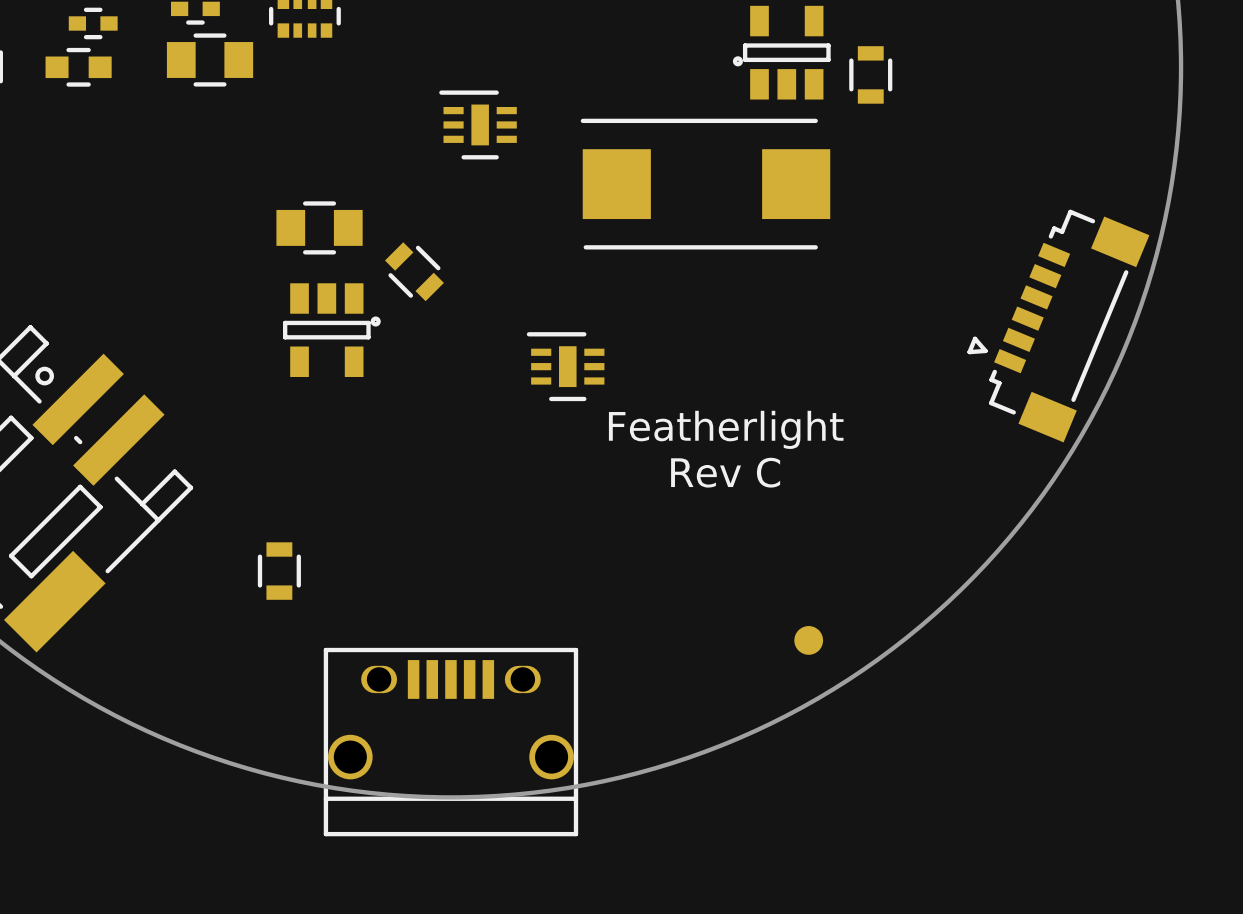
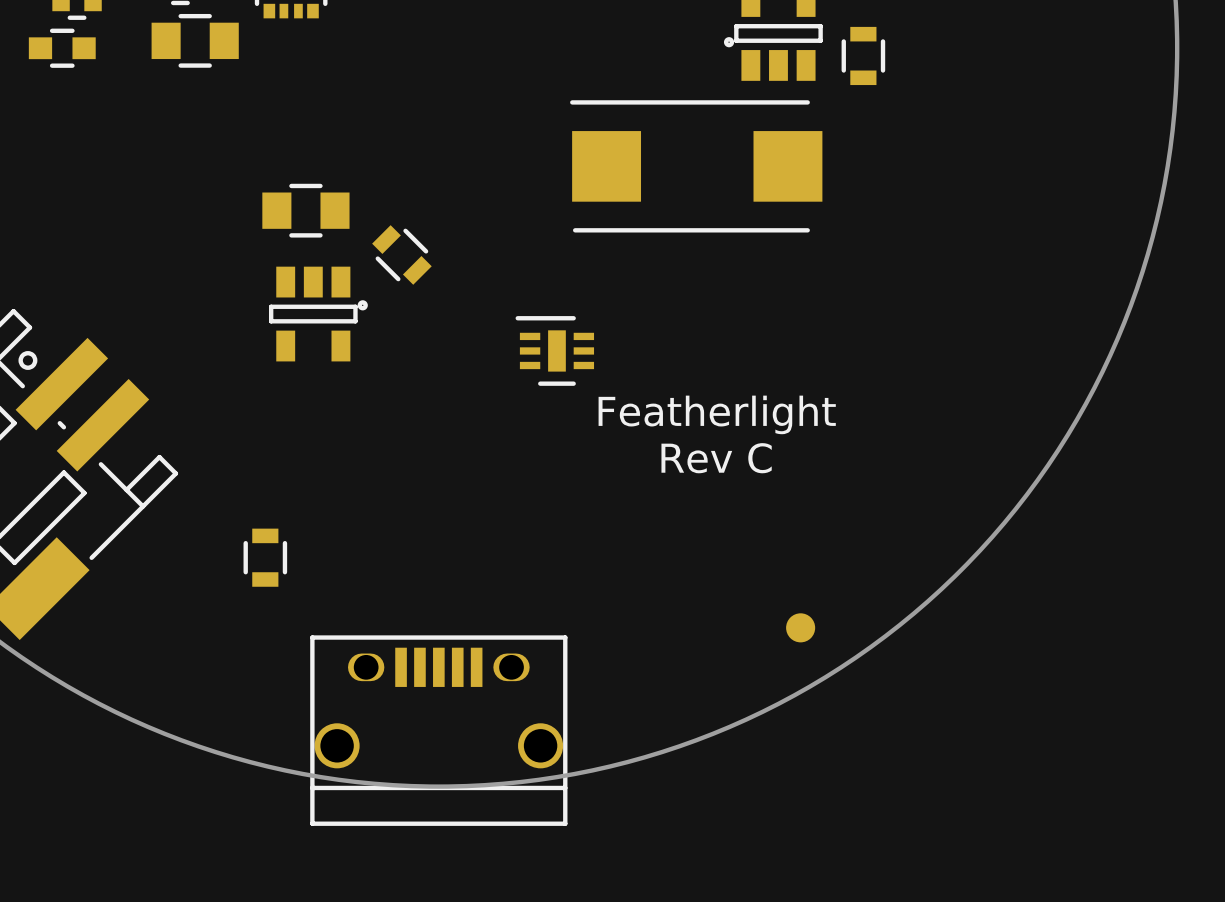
part: (478, 124) -> none
part: (1058, 326) -> none

